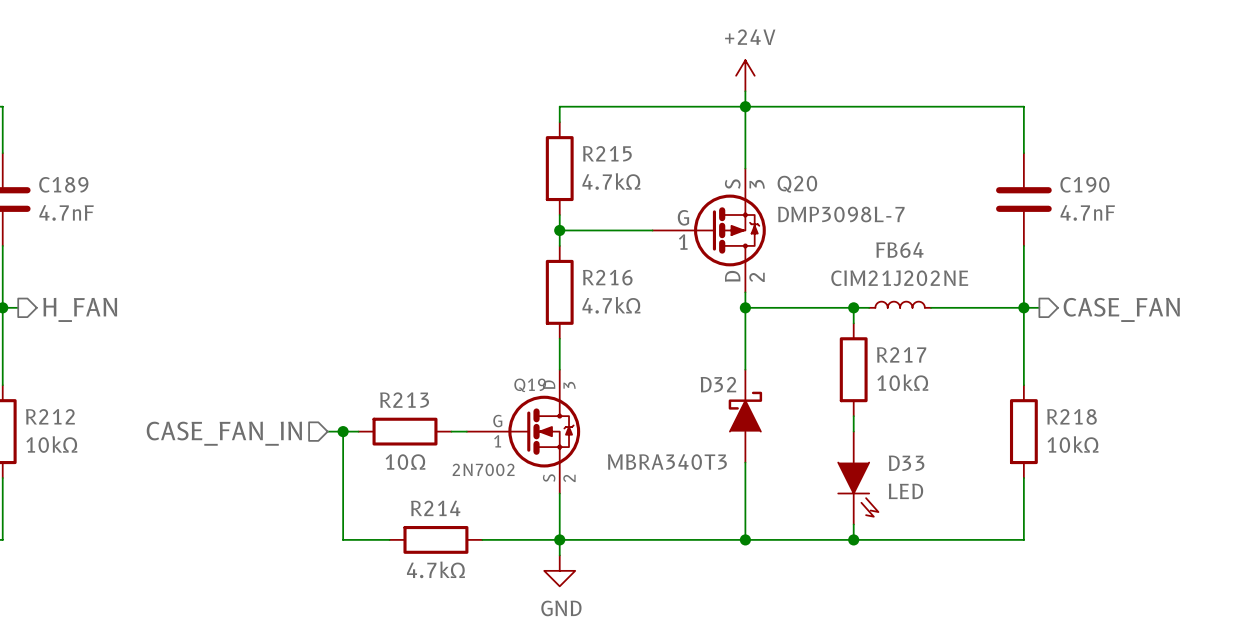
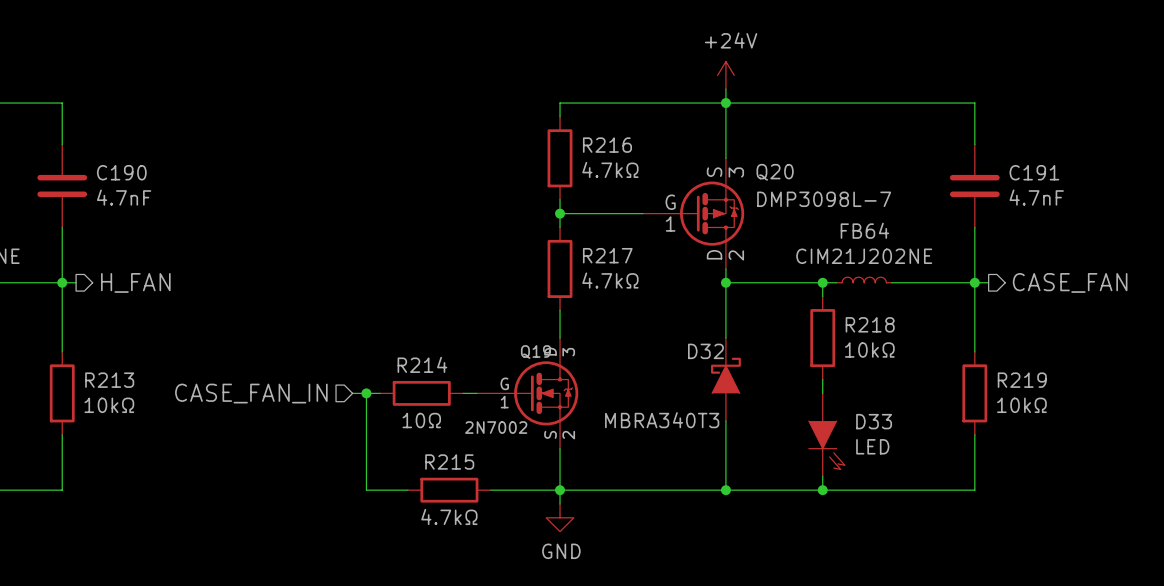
R215 name: R215 (607, 153) -> R216 (607, 145)
C189 name: C189 (63, 184) -> C190 (121, 172)
C190 name: C190 (1084, 184) -> C191 (1034, 172)
R216 name: R216 (607, 277) -> R217 (607, 255)
R217 name: R217 (901, 354) -> R218 (870, 324)
R213 name: R213 (404, 400) -> R214 (422, 364)
R212 name: R212 (50, 416) -> R213 (109, 380)
R218 name: R218 (1071, 416) -> R219 (1022, 380)
R214 name: R214 (435, 508) -> R215 (449, 462)

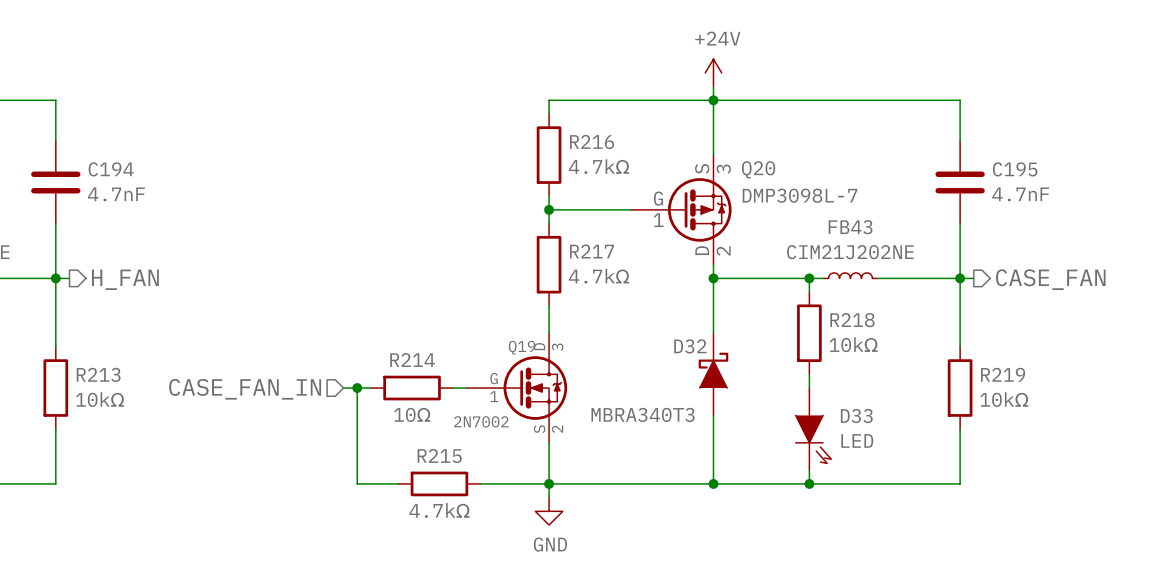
C190 name: C190 (121, 172) -> C194 (111, 169)
C191 name: C191 (1034, 172) -> C195 (1015, 169)
FB64 name: FB64 (864, 230) -> FB43 (850, 227)

